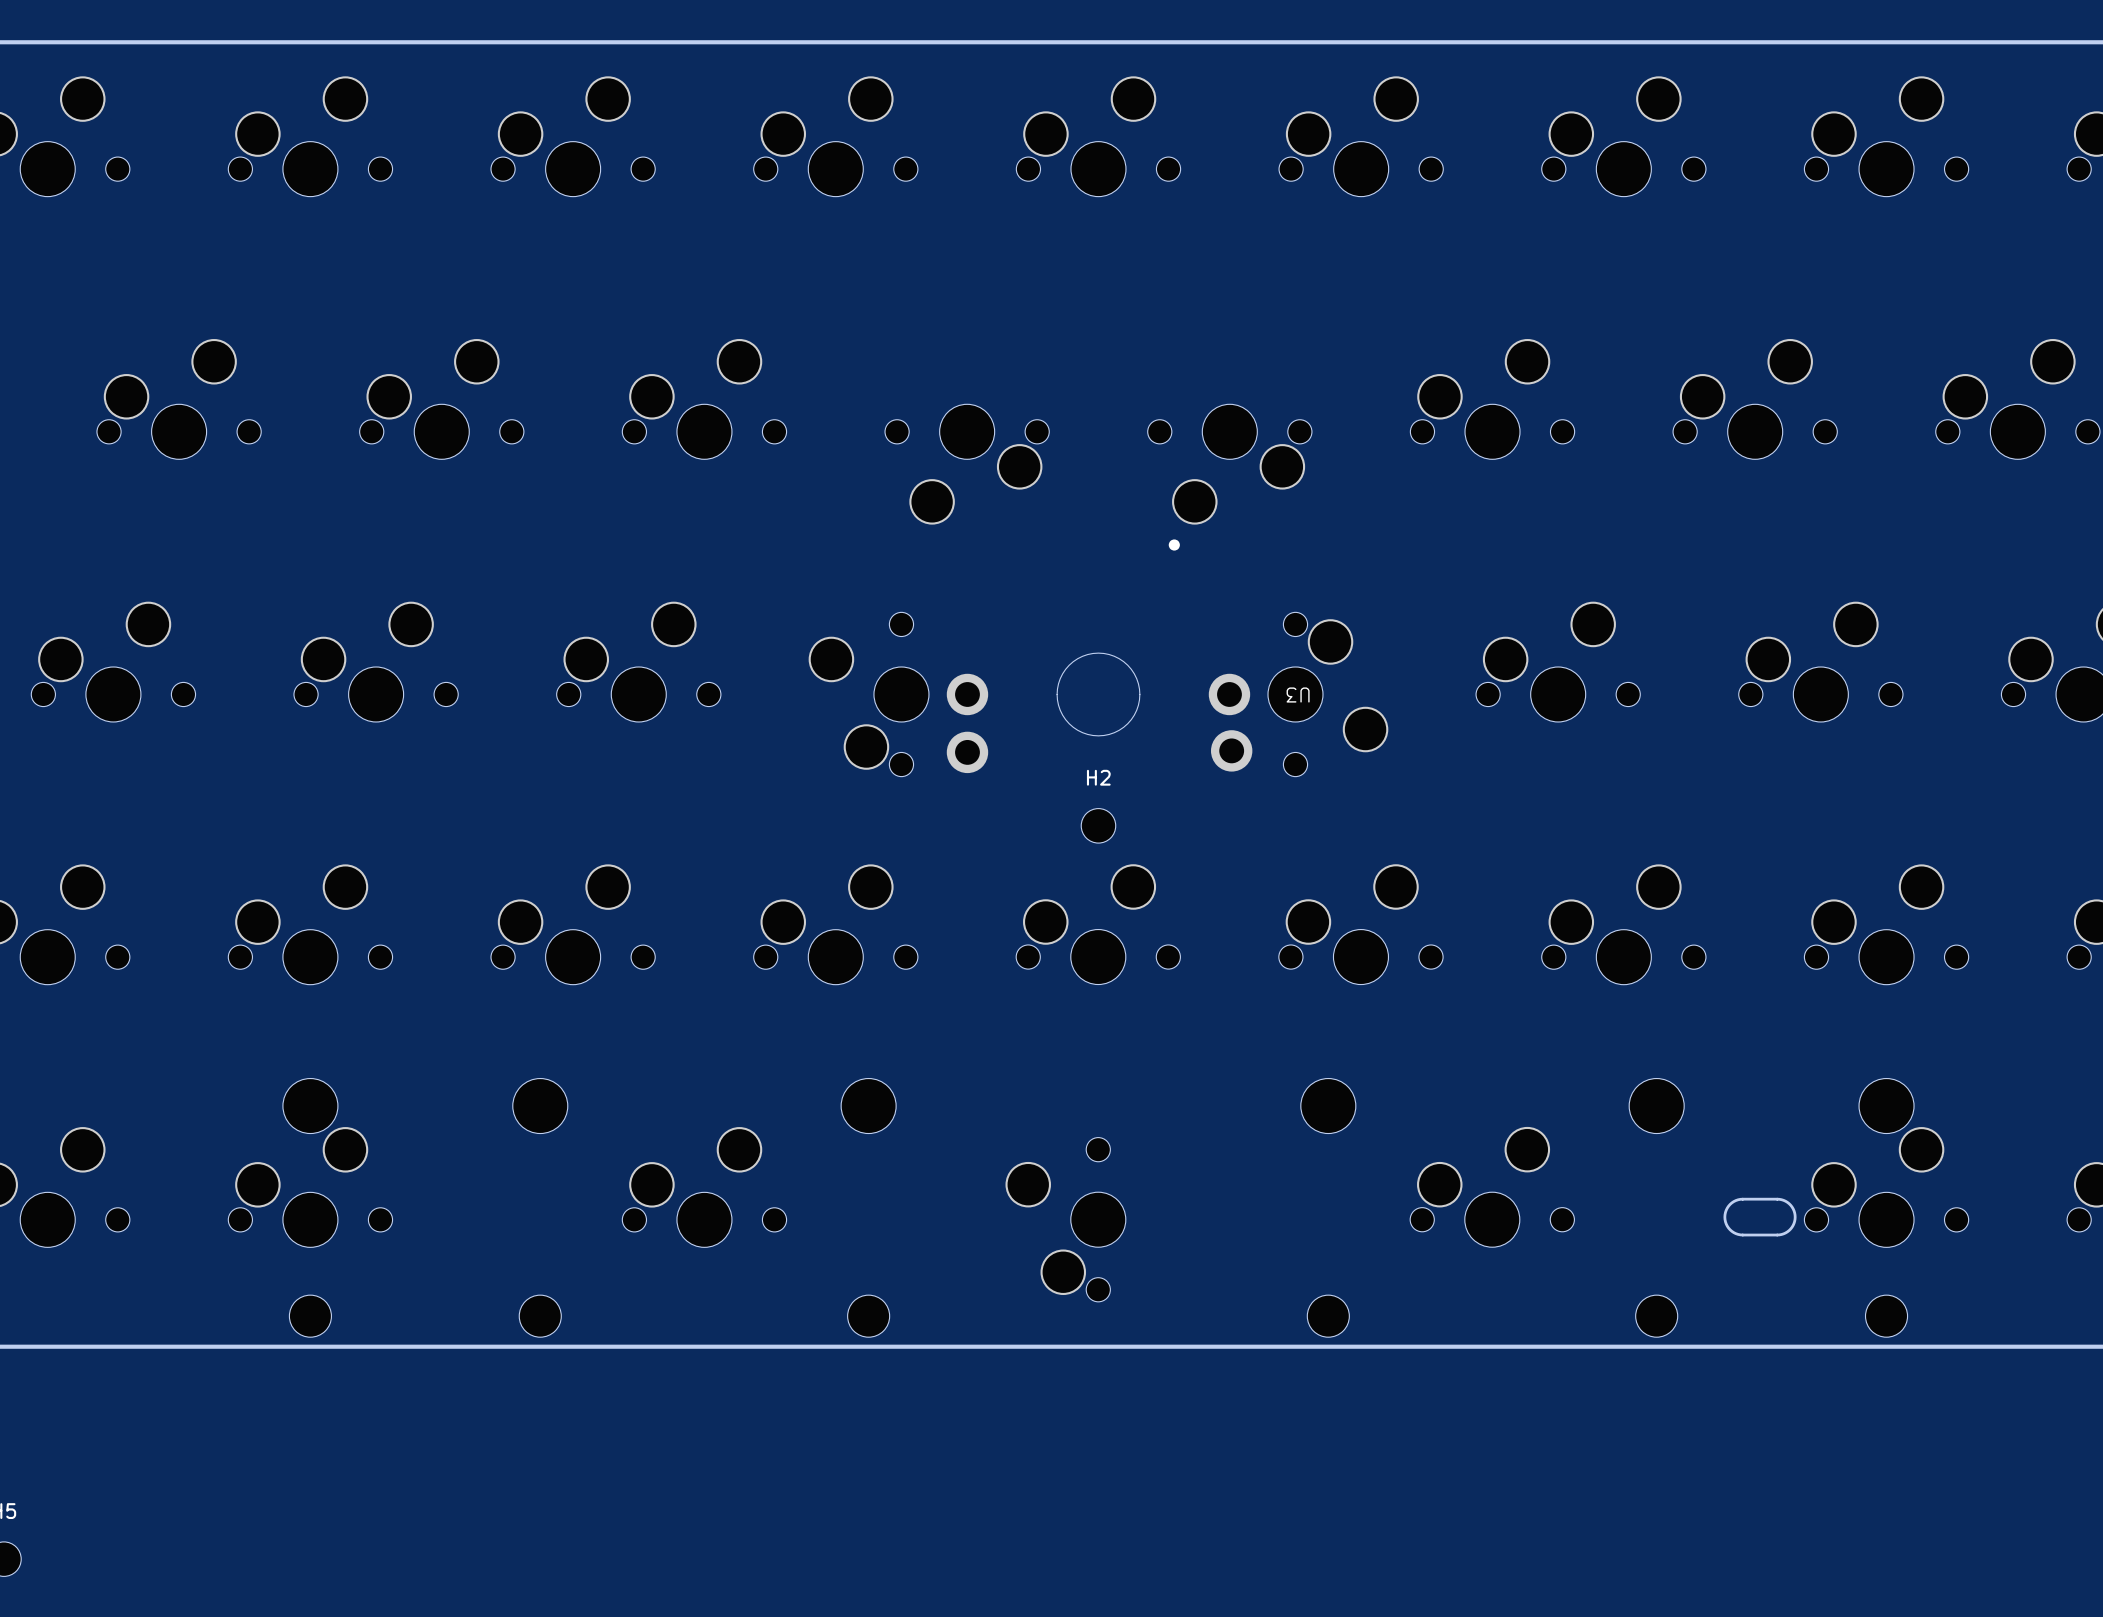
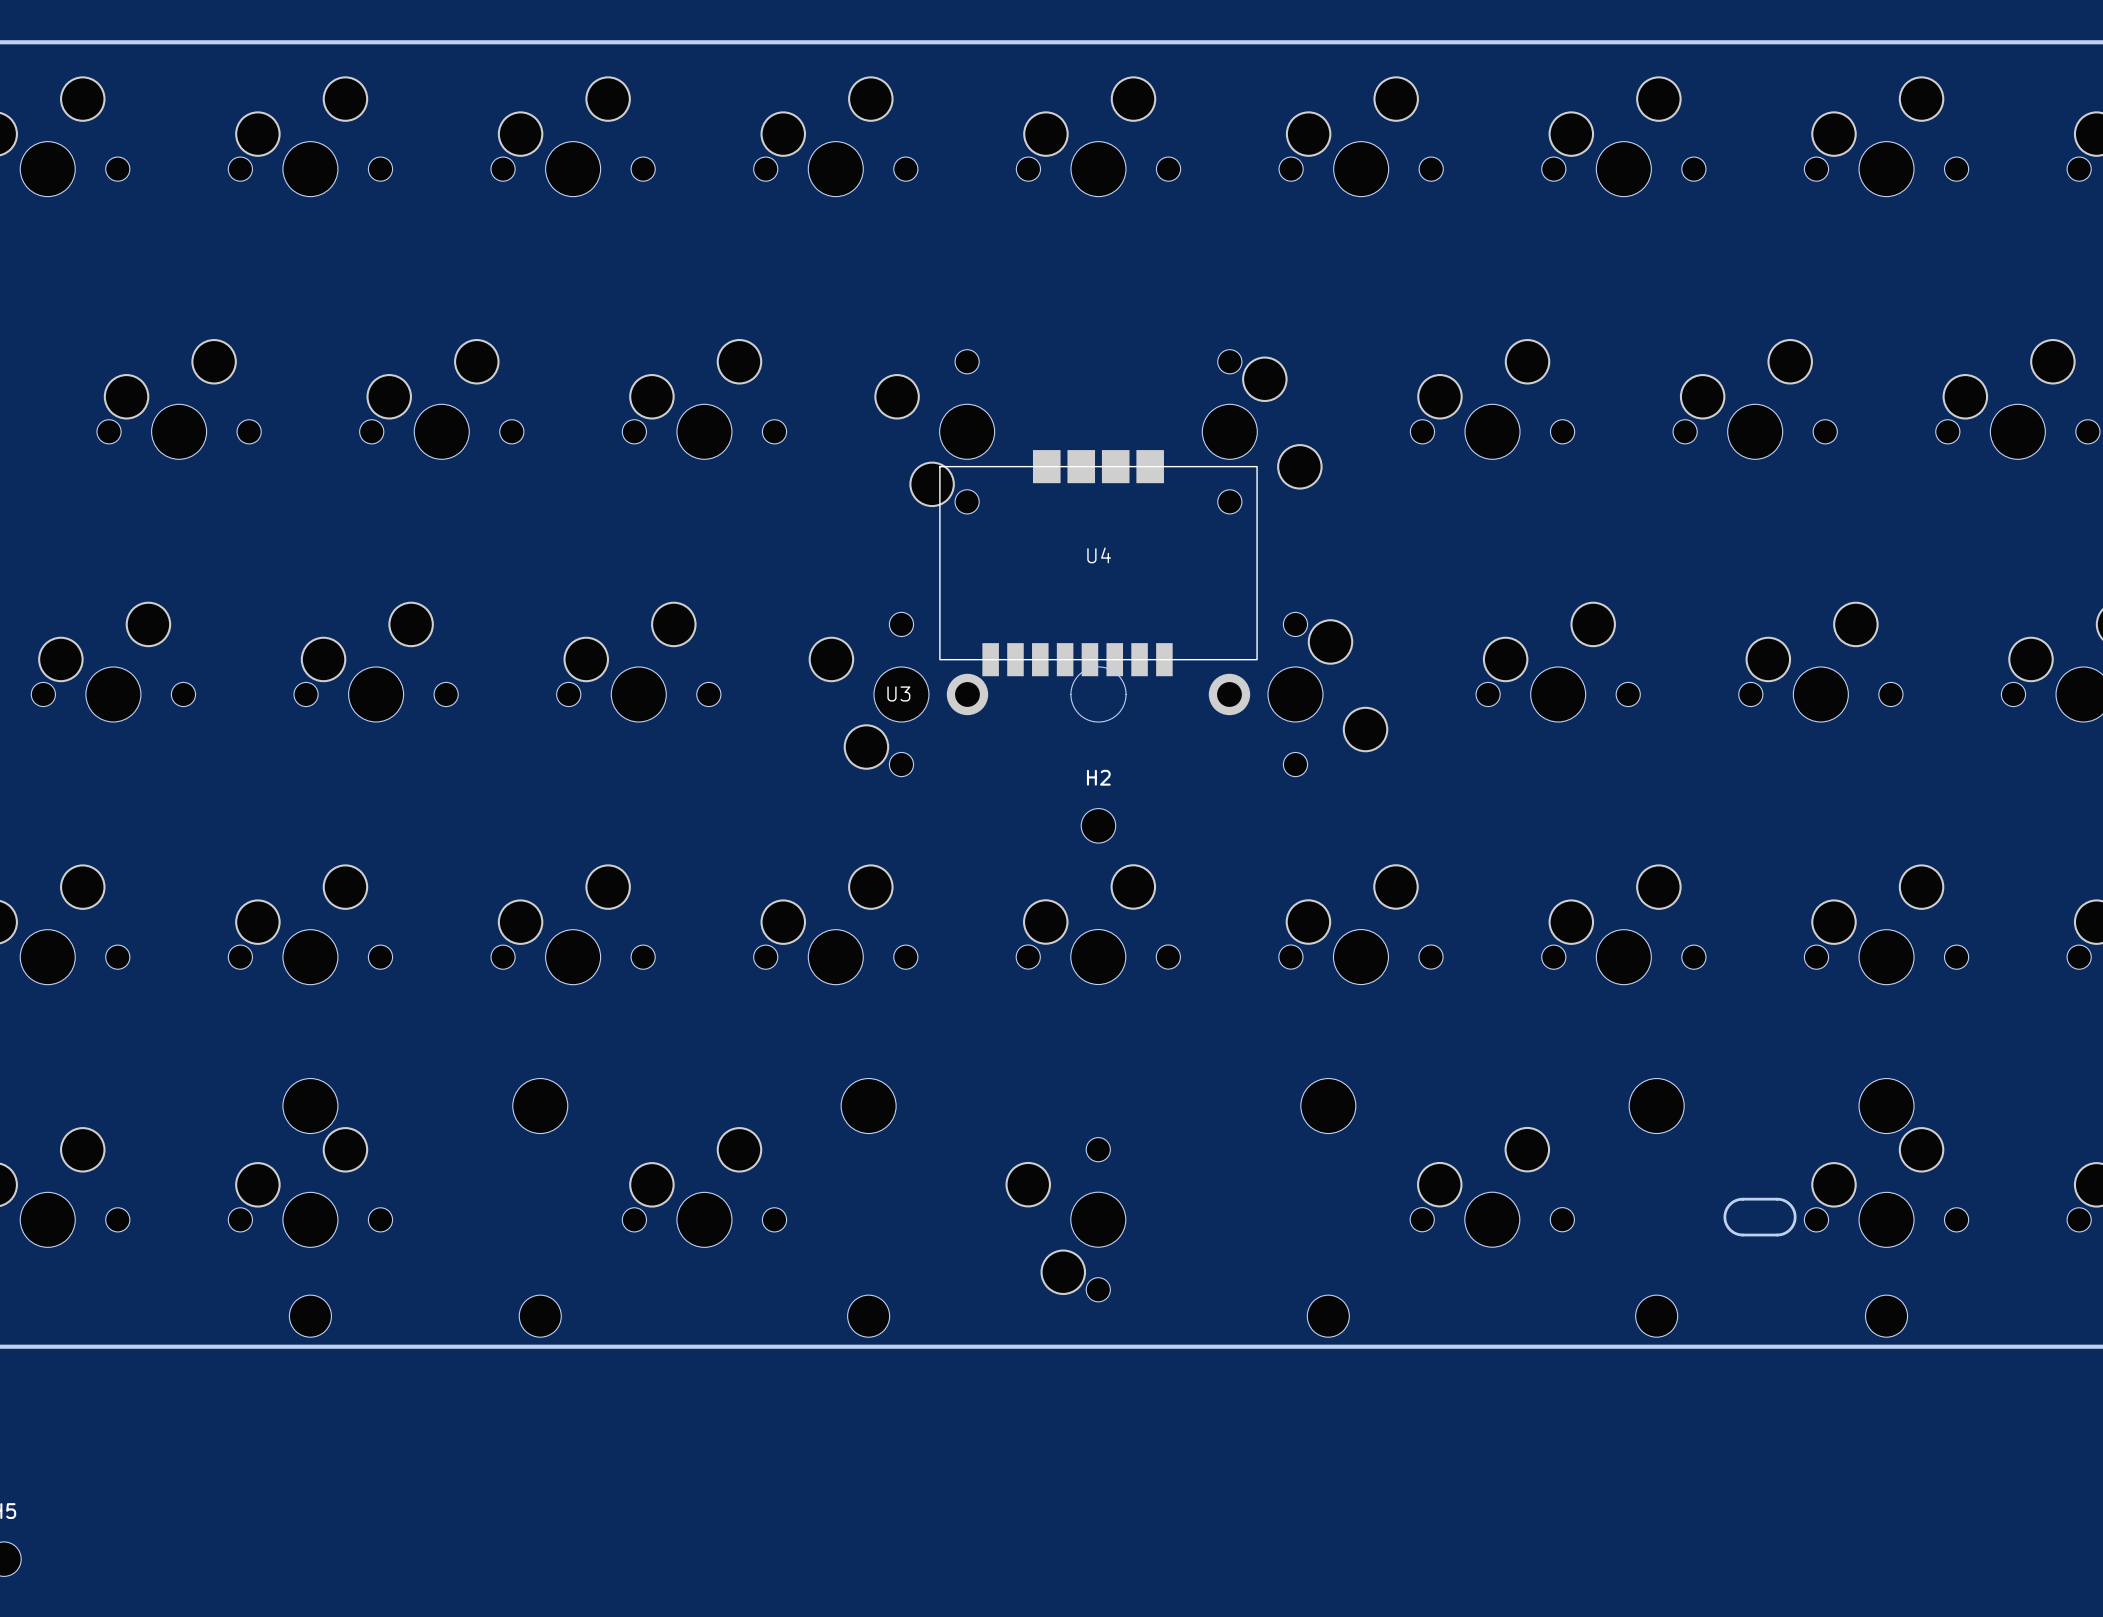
part rotation: 0° (967, 464) -> 90° clockwise (934, 431)
part rotation: 0° (1229, 464) -> 90° counterclockwise (1262, 431)
U3 footprint: [946, 539, 1253, 774] -> [946, 666, 1251, 723]
U4: none -> (1098, 563)
U3 name position: U3 (1298, 695) -> U3 (898, 693)

